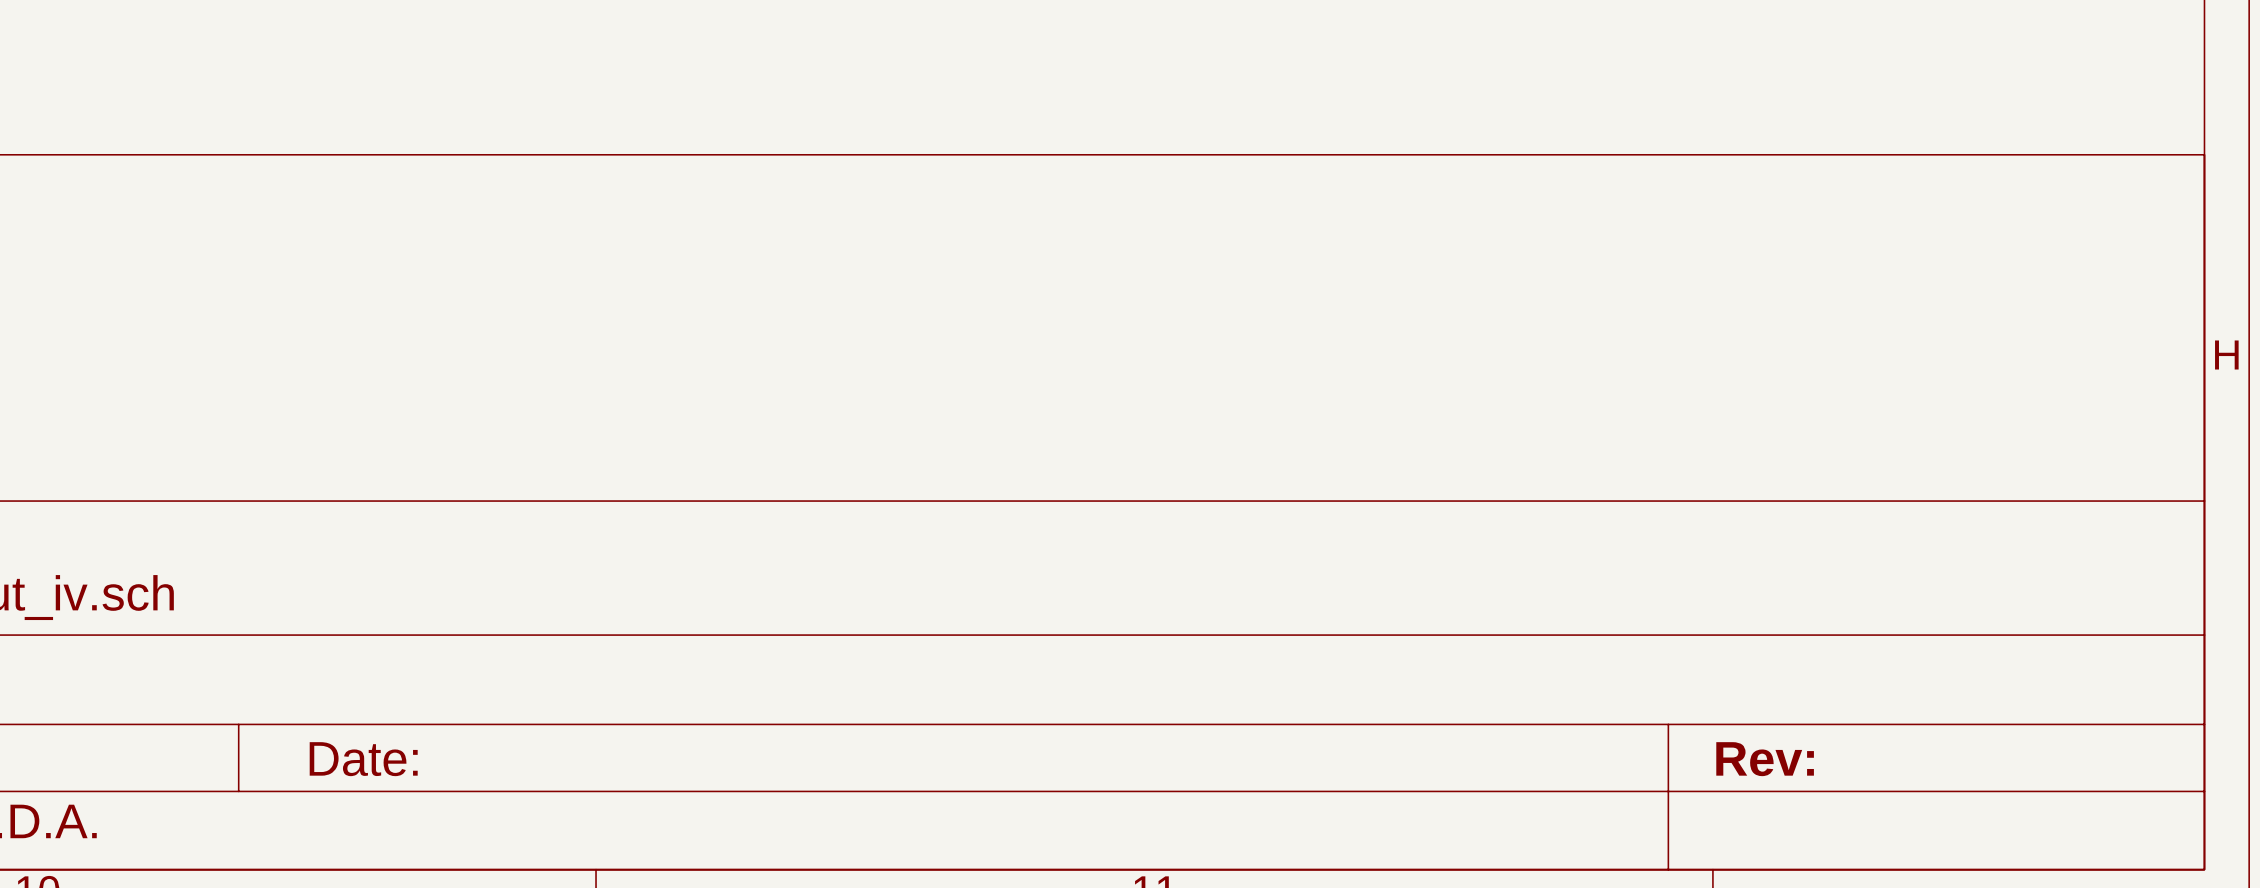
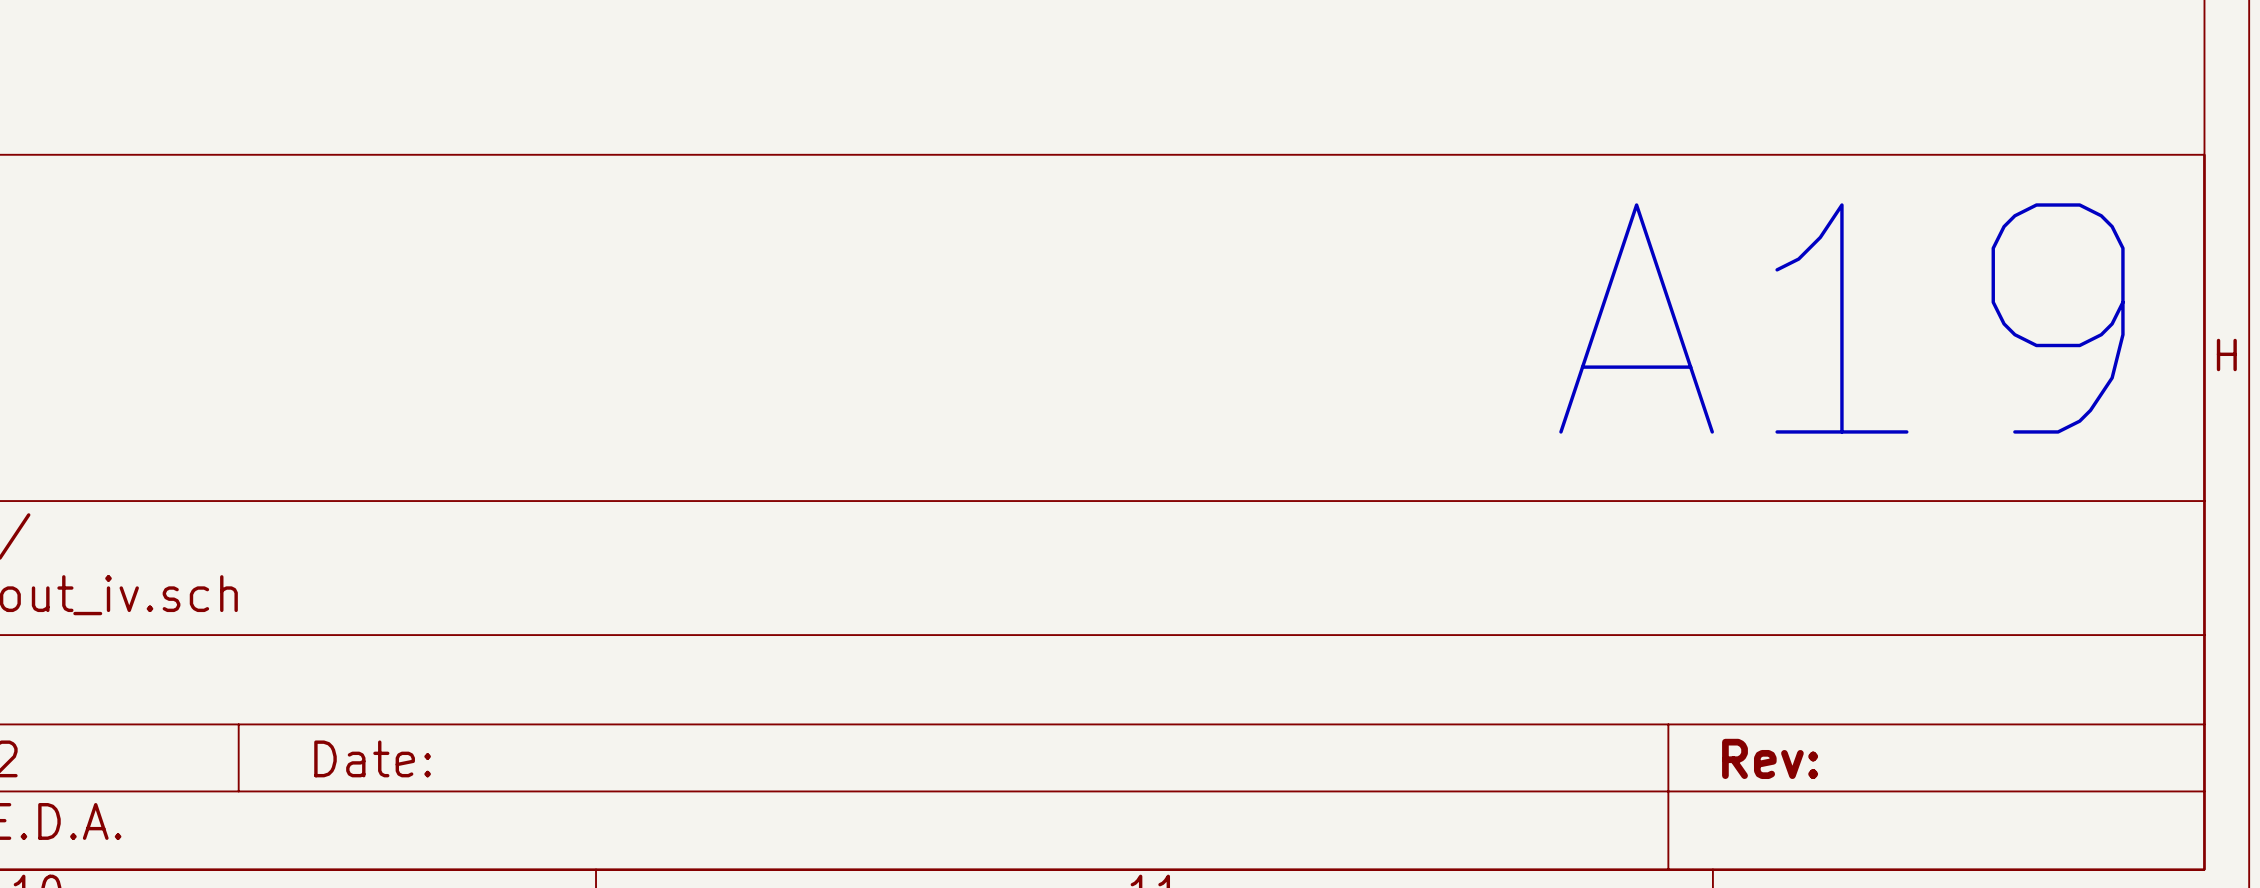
text: none -> A19 (1841, 318)

